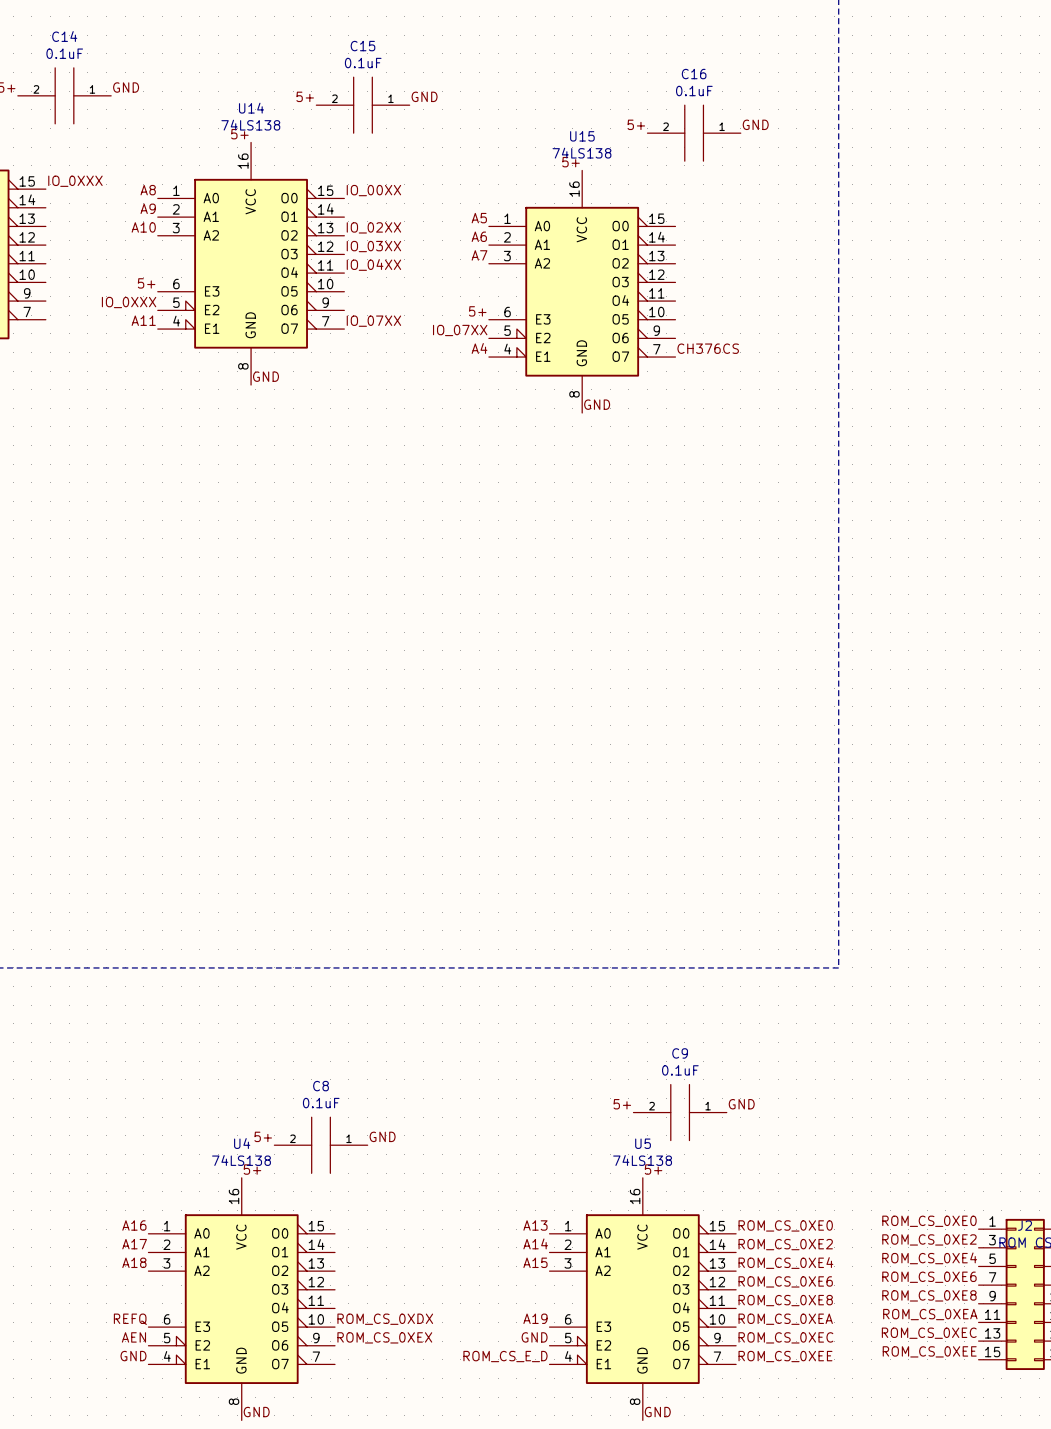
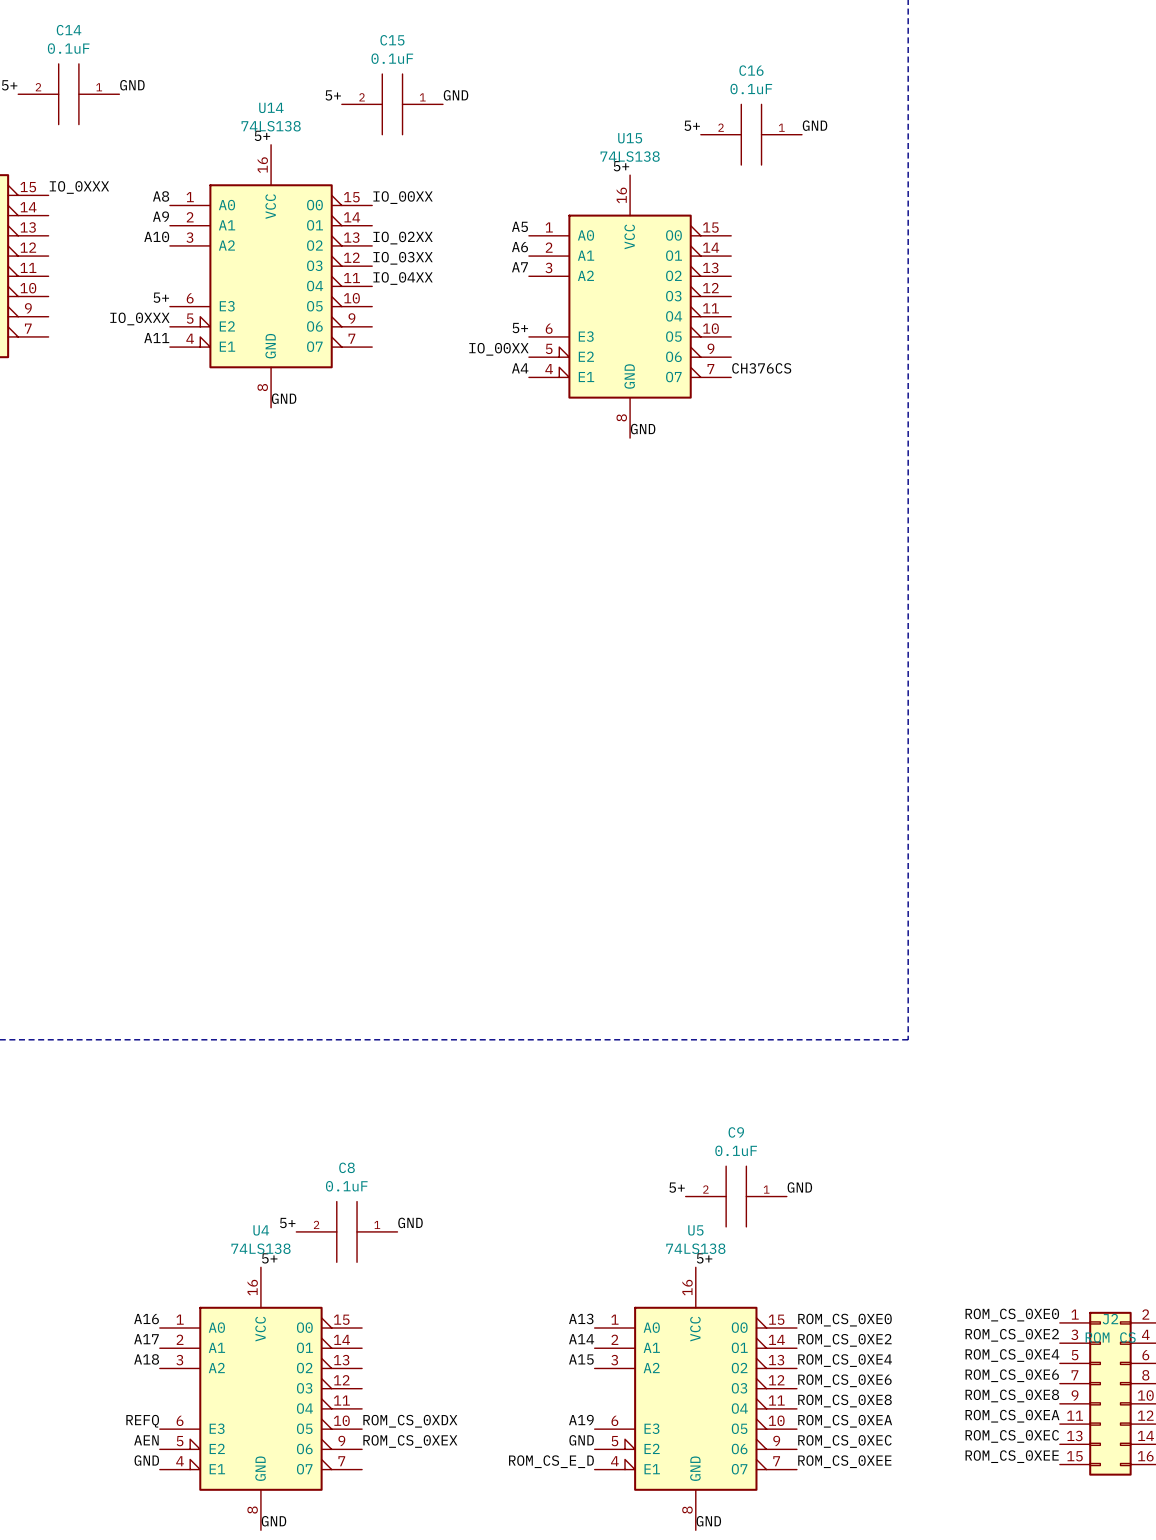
label: IO_07XX (373, 321) -> none
label: IO_07XX (460, 330) -> IO_00XX (498, 349)

